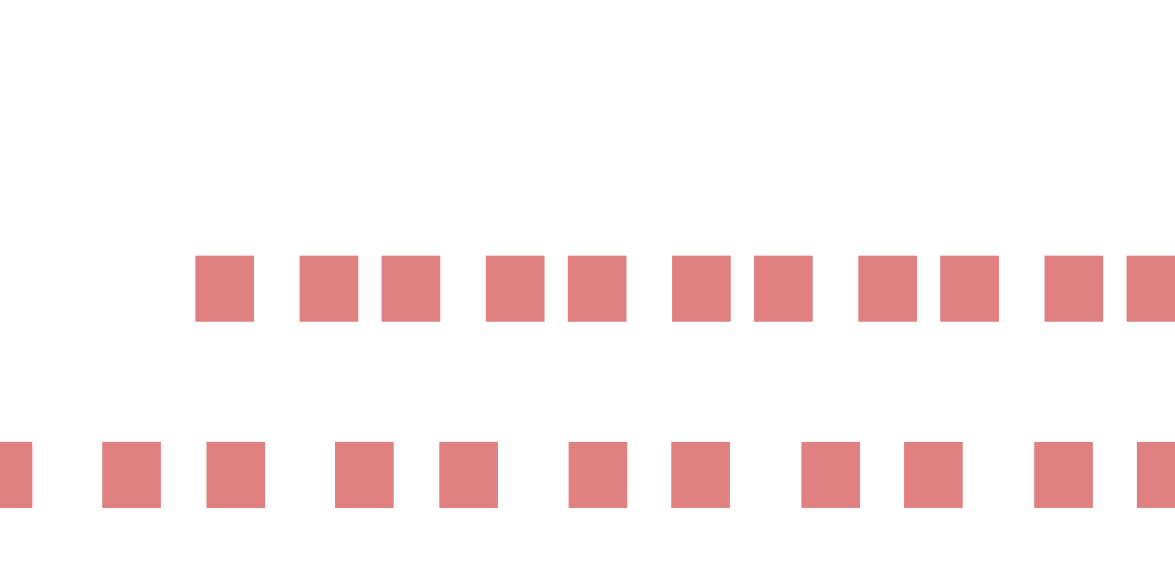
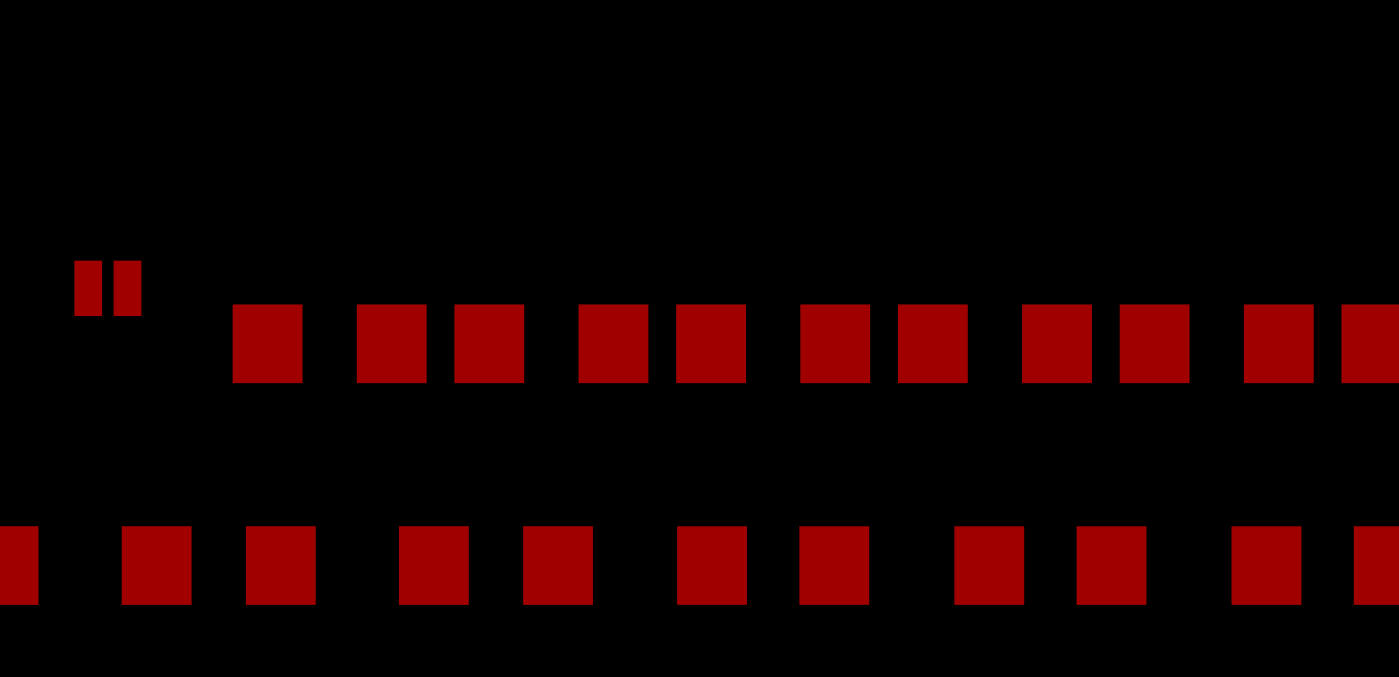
part: none -> (107, 288)

